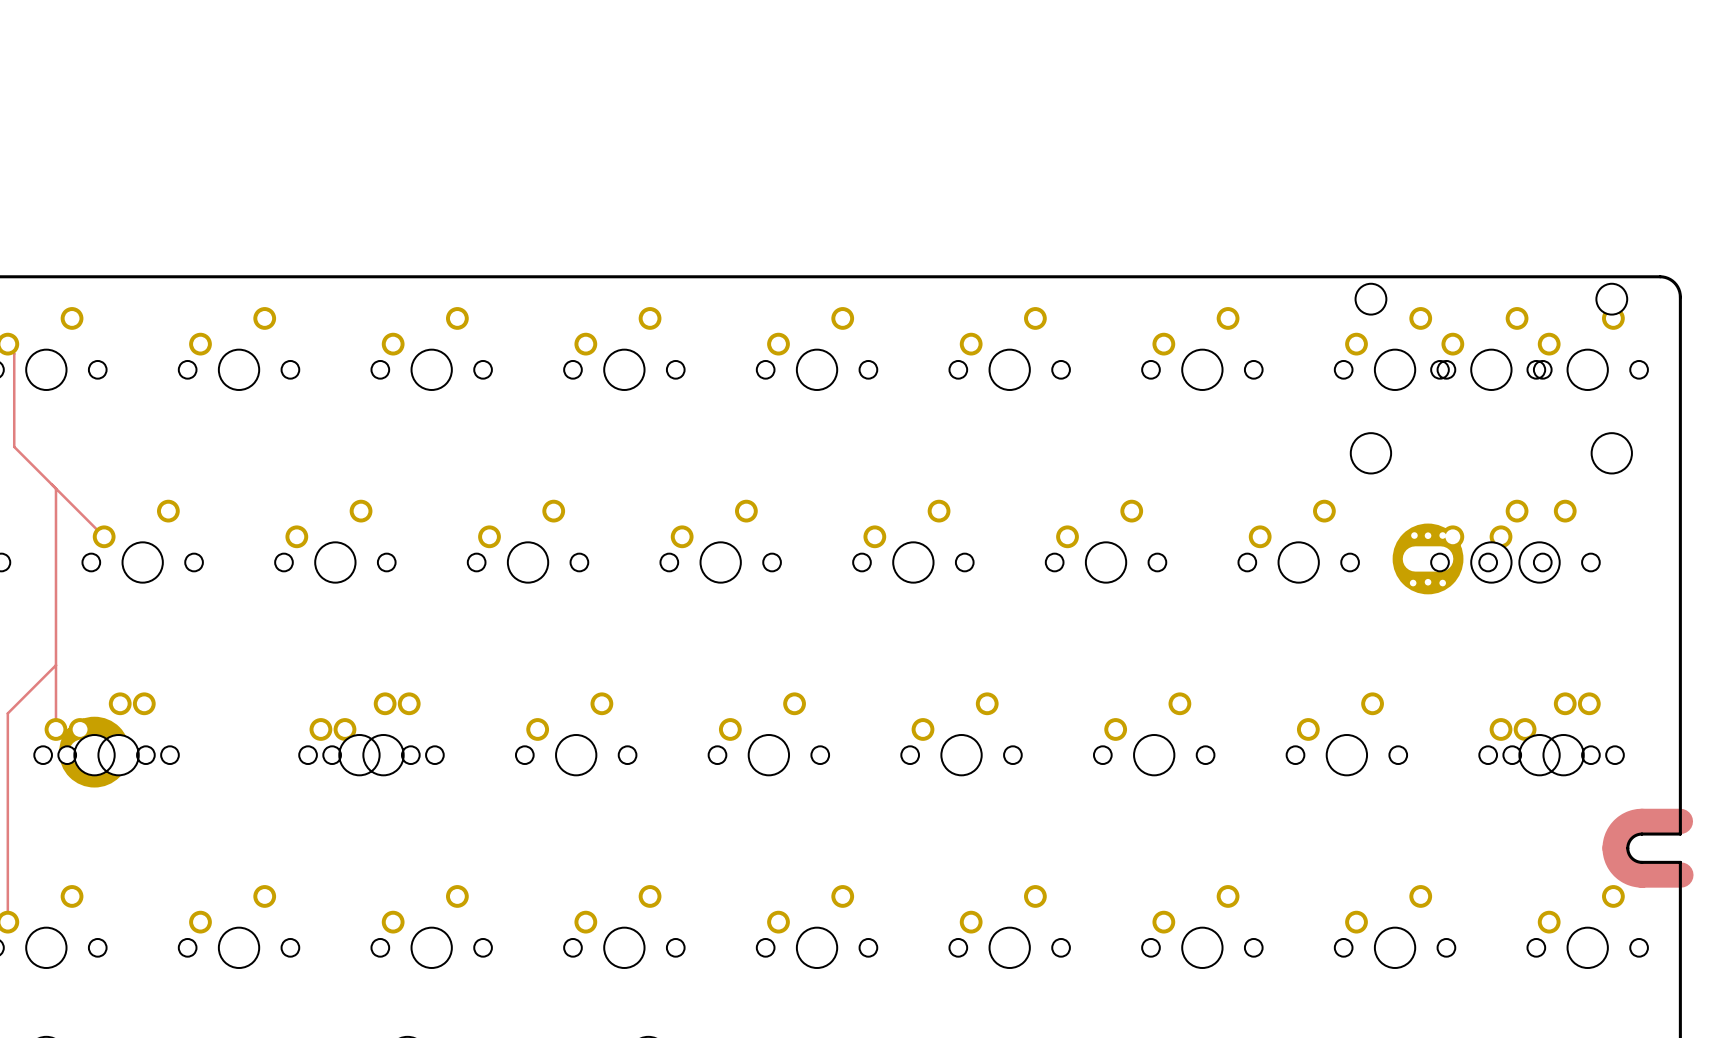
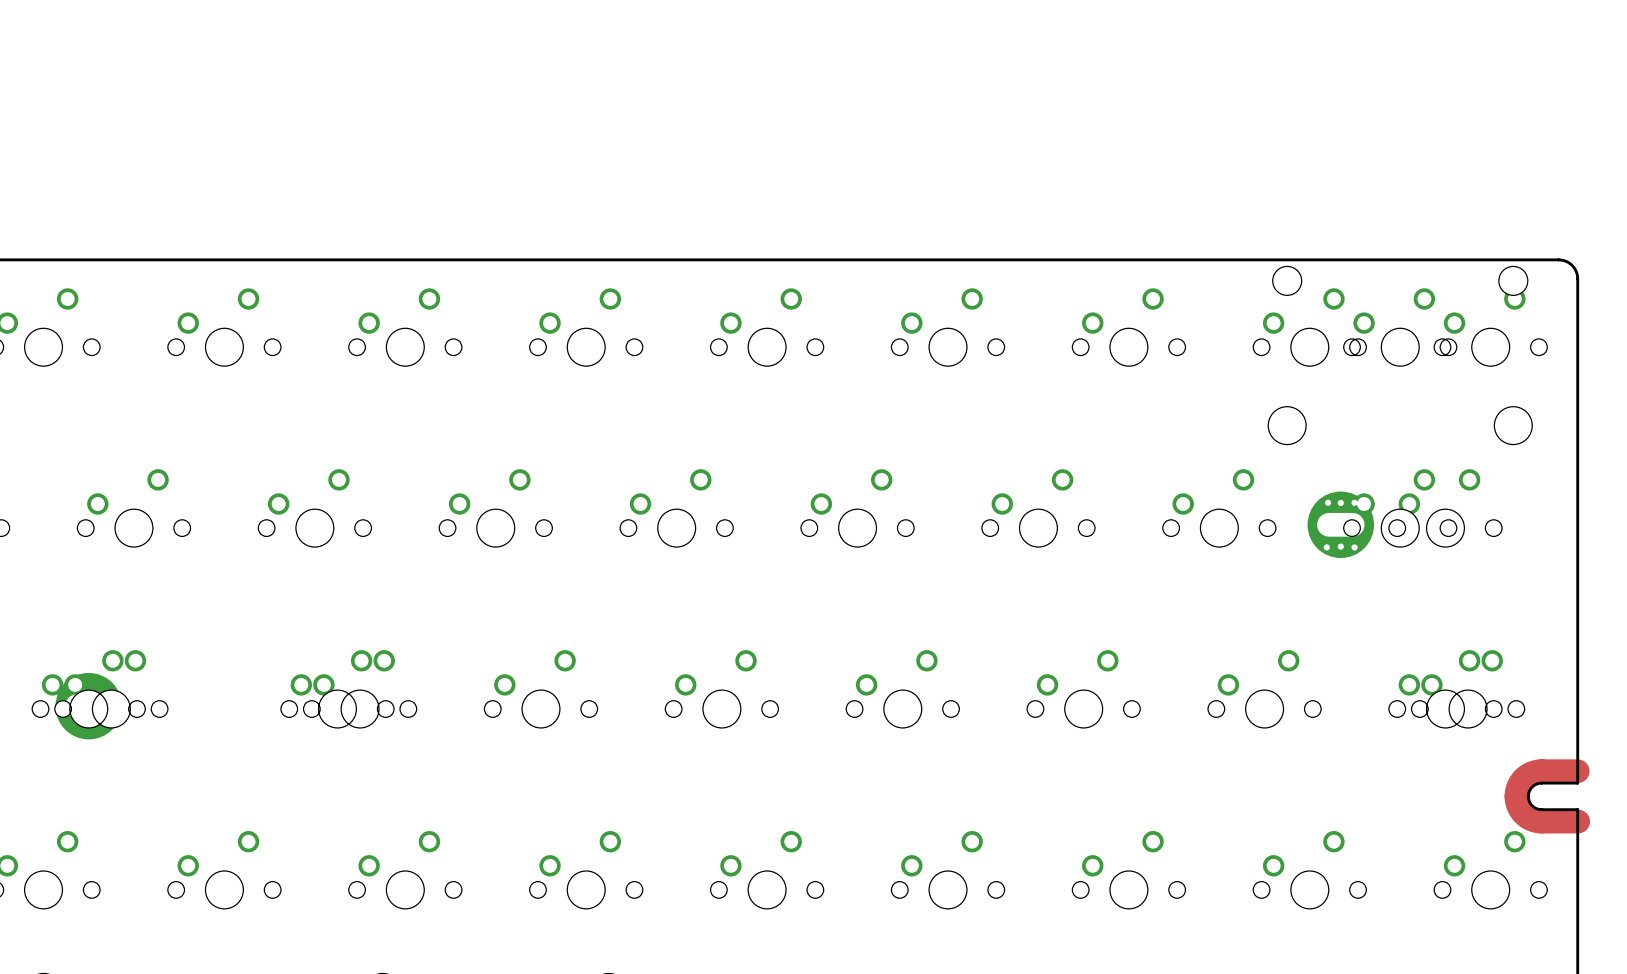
track: (7, 344) (7, 347) (14, 353) (14, 446) (104, 536) -> none
track: (55, 488) (55, 729) -> none
track: (55, 665) (7, 713) (7, 922) -> none

